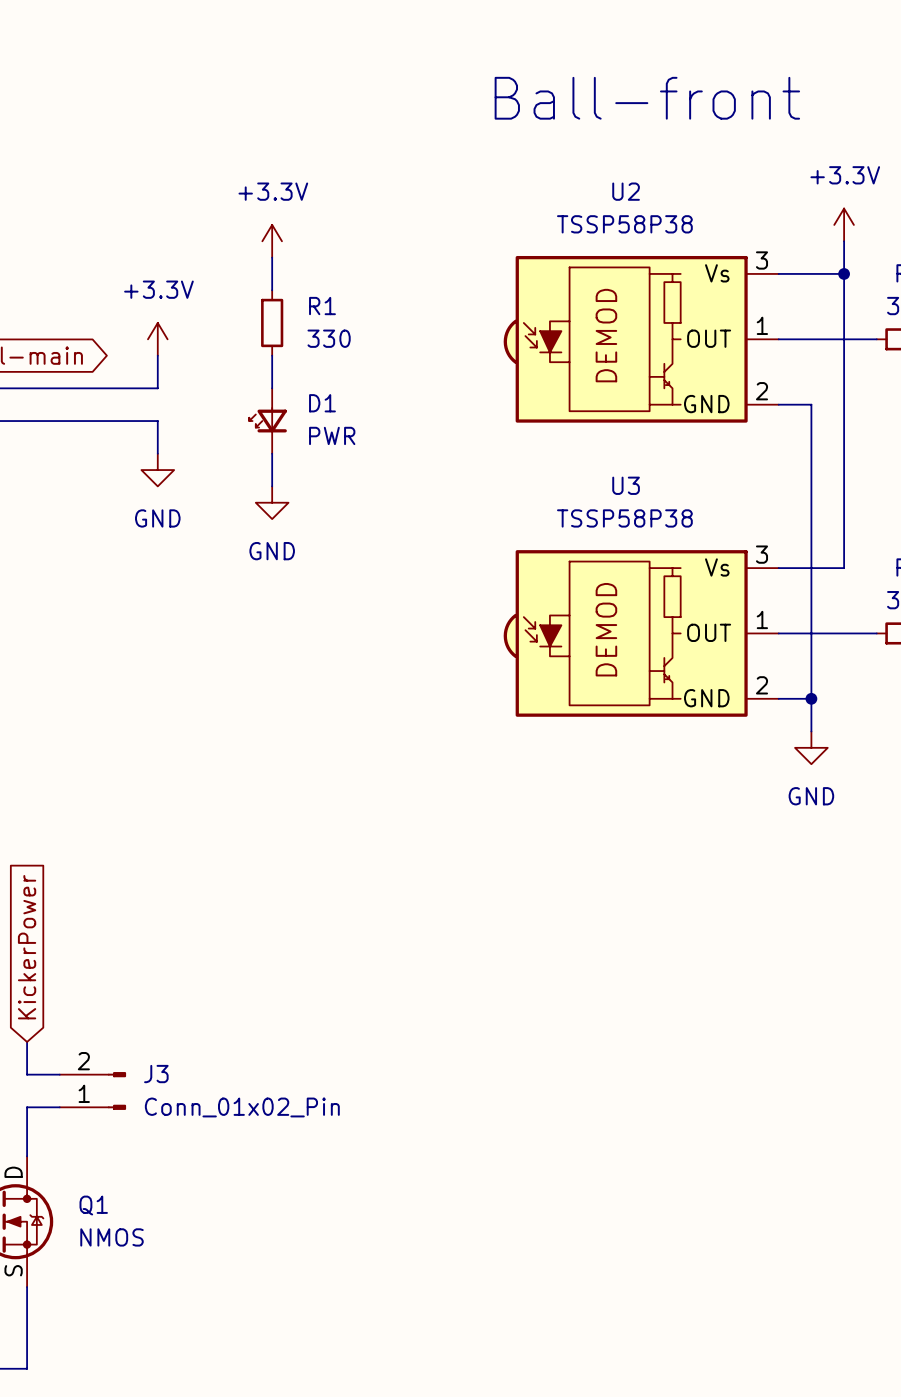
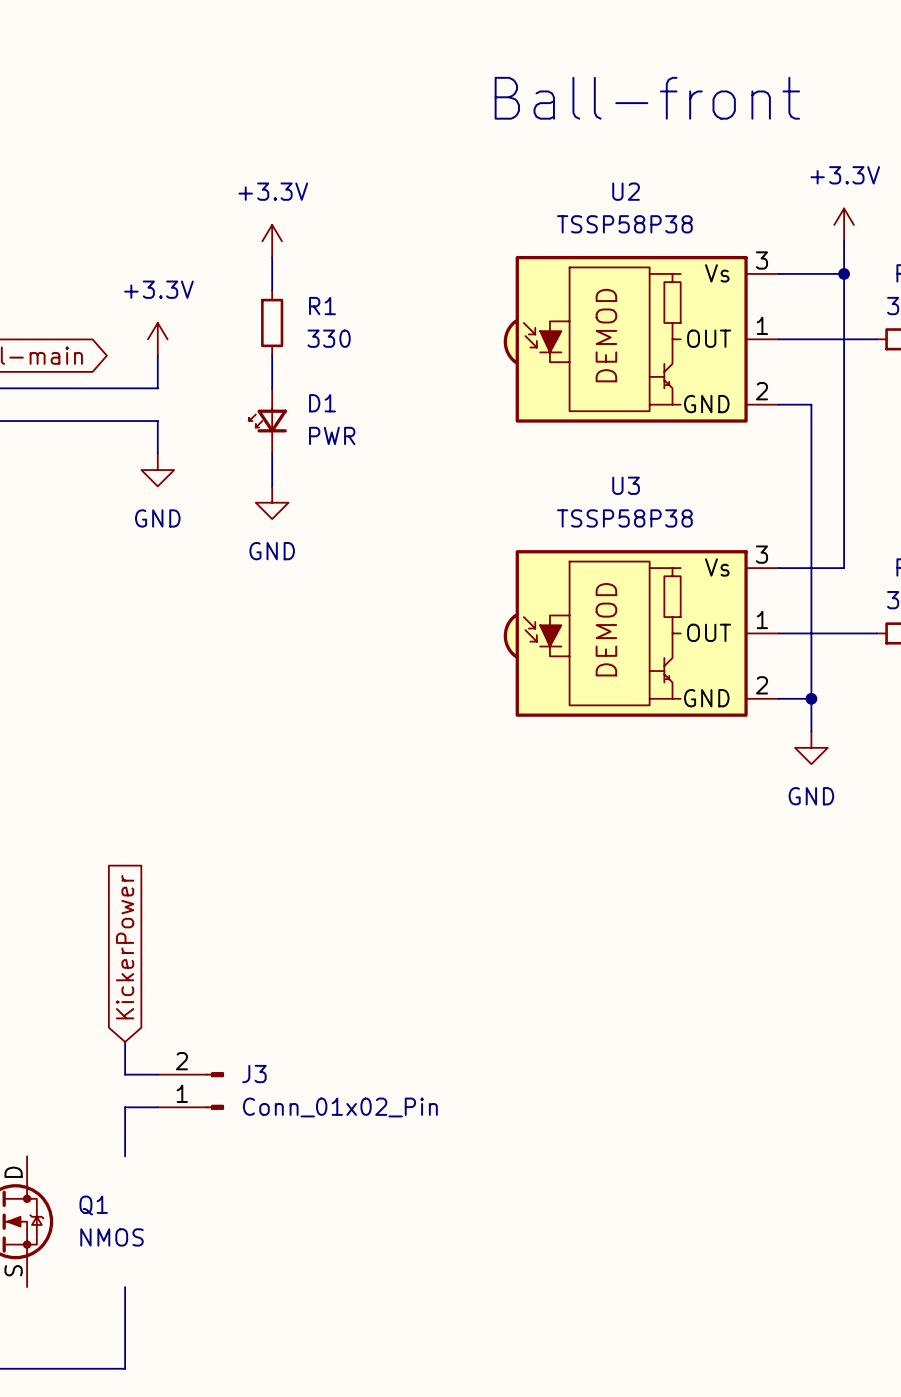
global label position: KickerPower (27, 947) -> KickerPower (125, 947)
wire: (27, 1041) (27, 1074) (59, 1074) -> (125, 1041) (125, 1074) (157, 1074)
J3 position: (92, 1090) -> (190, 1090)
wire: (59, 1107) (27, 1107) (27, 1156) -> (157, 1107) (125, 1107) (125, 1156)
wire: (27, 1287) (27, 1368) -> (125, 1287) (125, 1368) (27, 1368)

